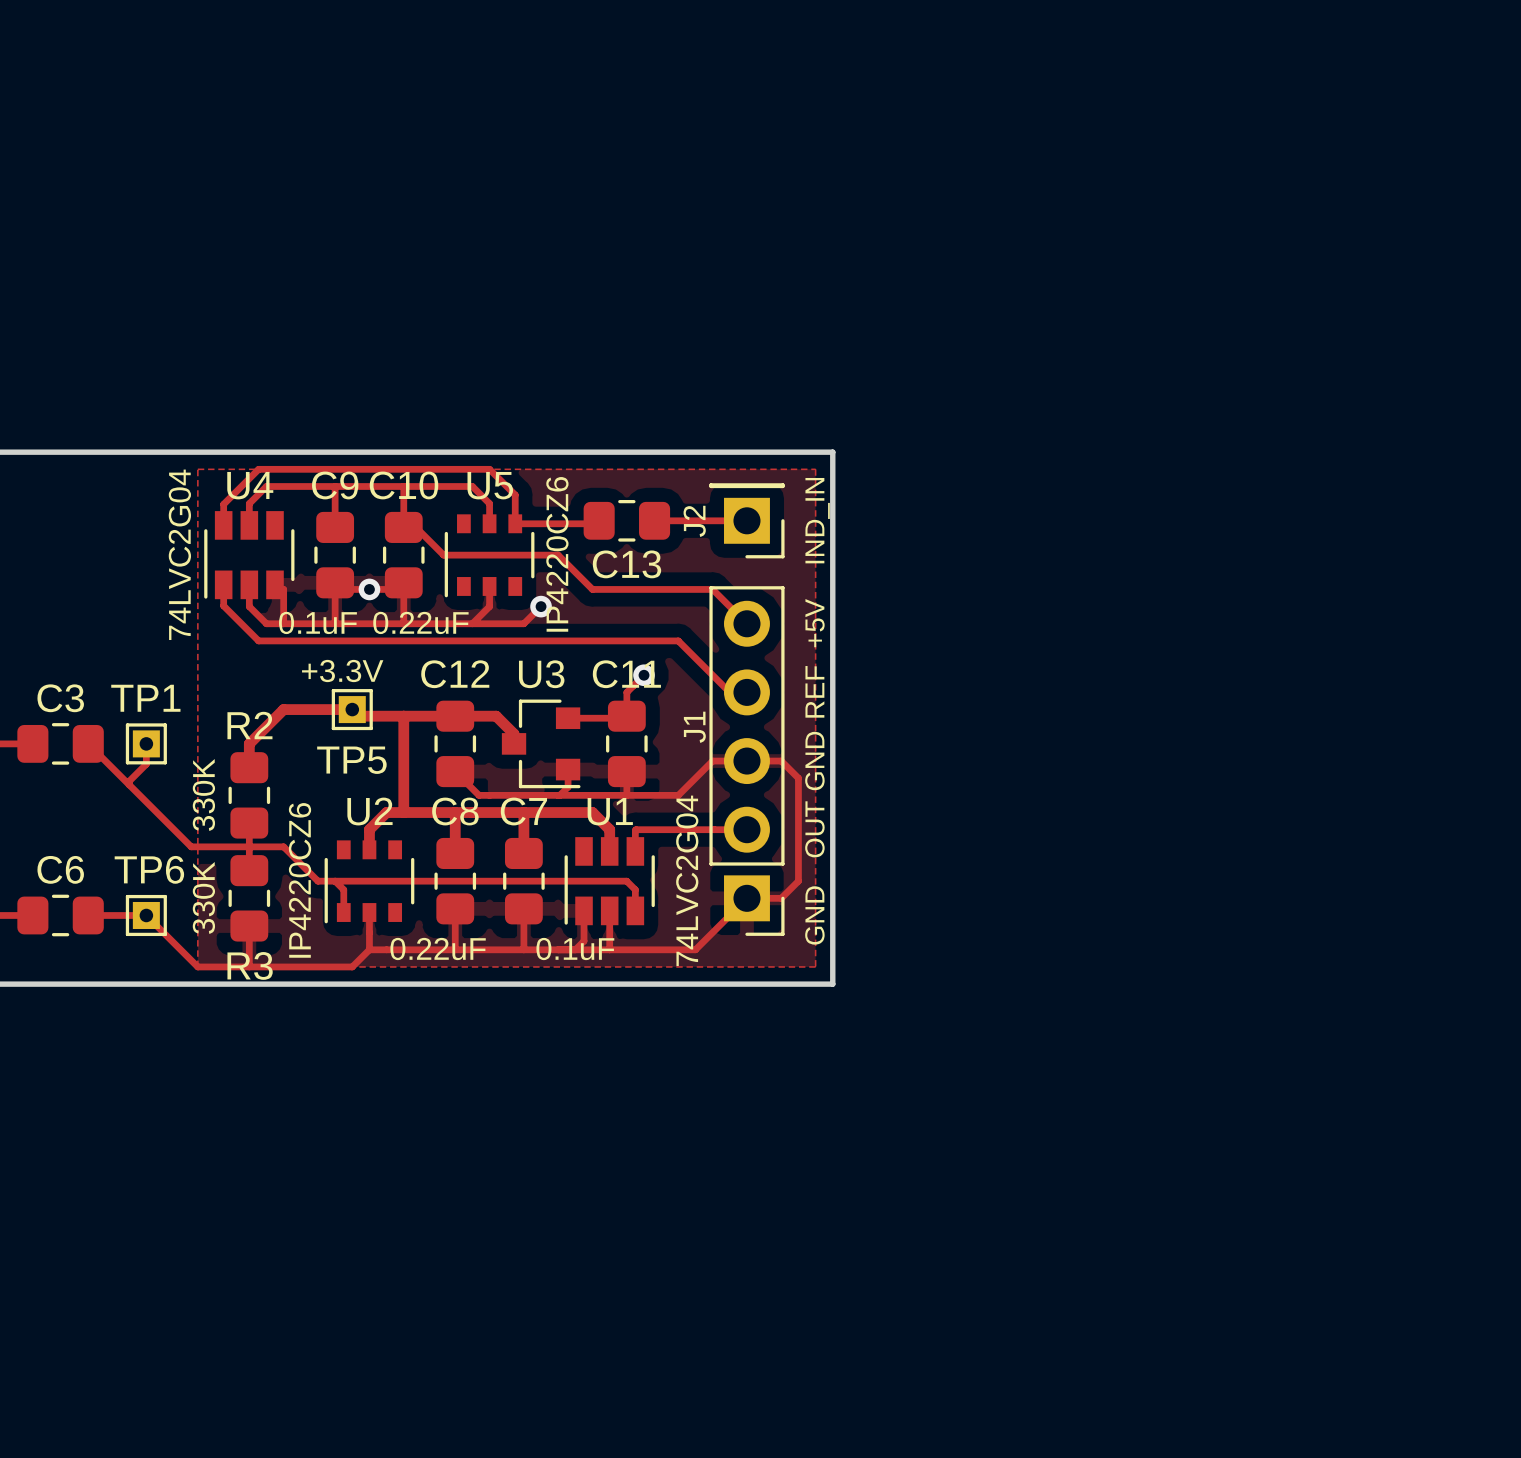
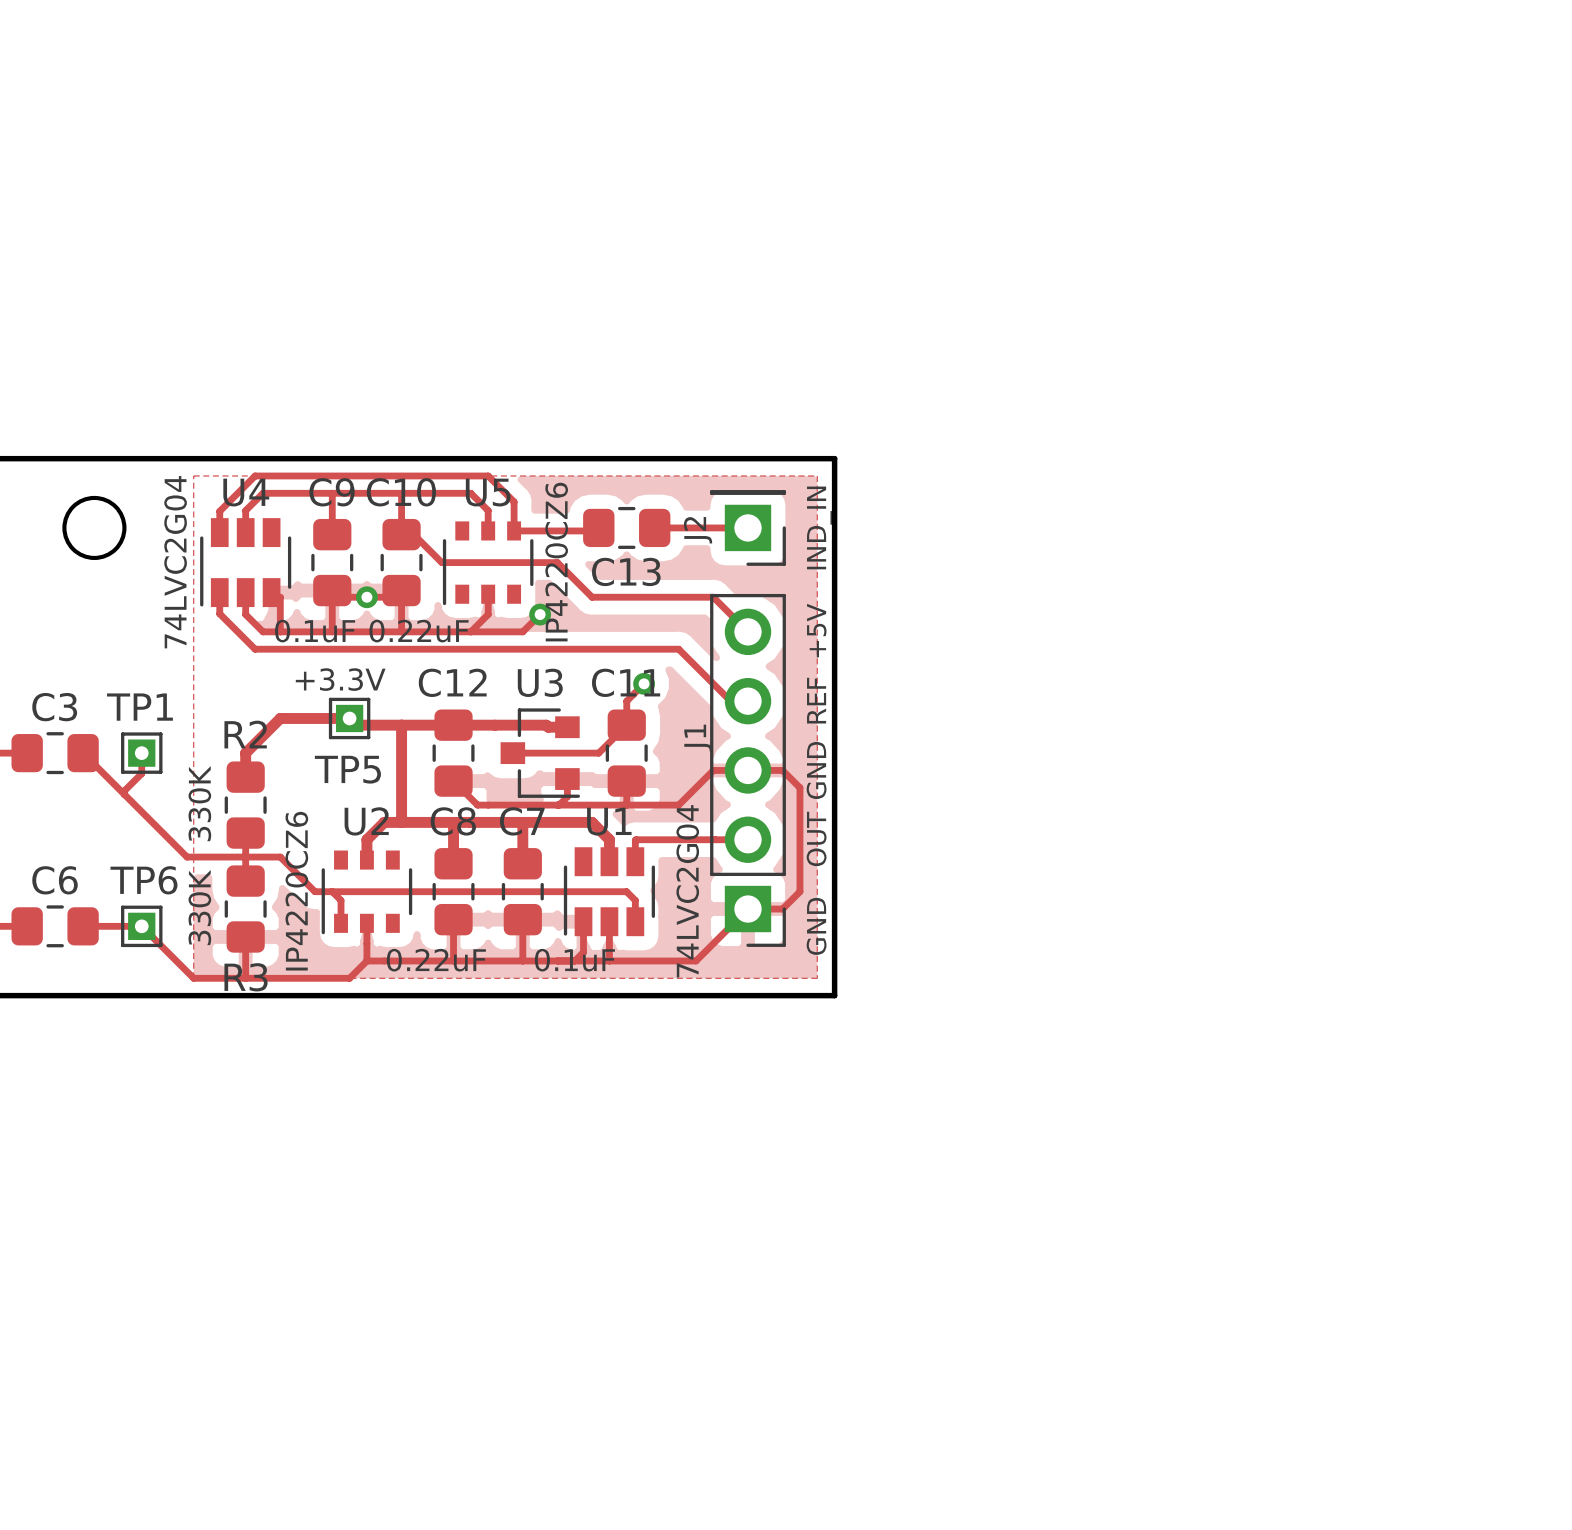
round board edge: none -> [62, 495, 127, 561]
track: (496, 716) (514, 734) (514, 743) -> (494, 725) (567, 727)
track: (568, 718) (624, 718) -> (512, 753) (598, 753) (624, 727)

